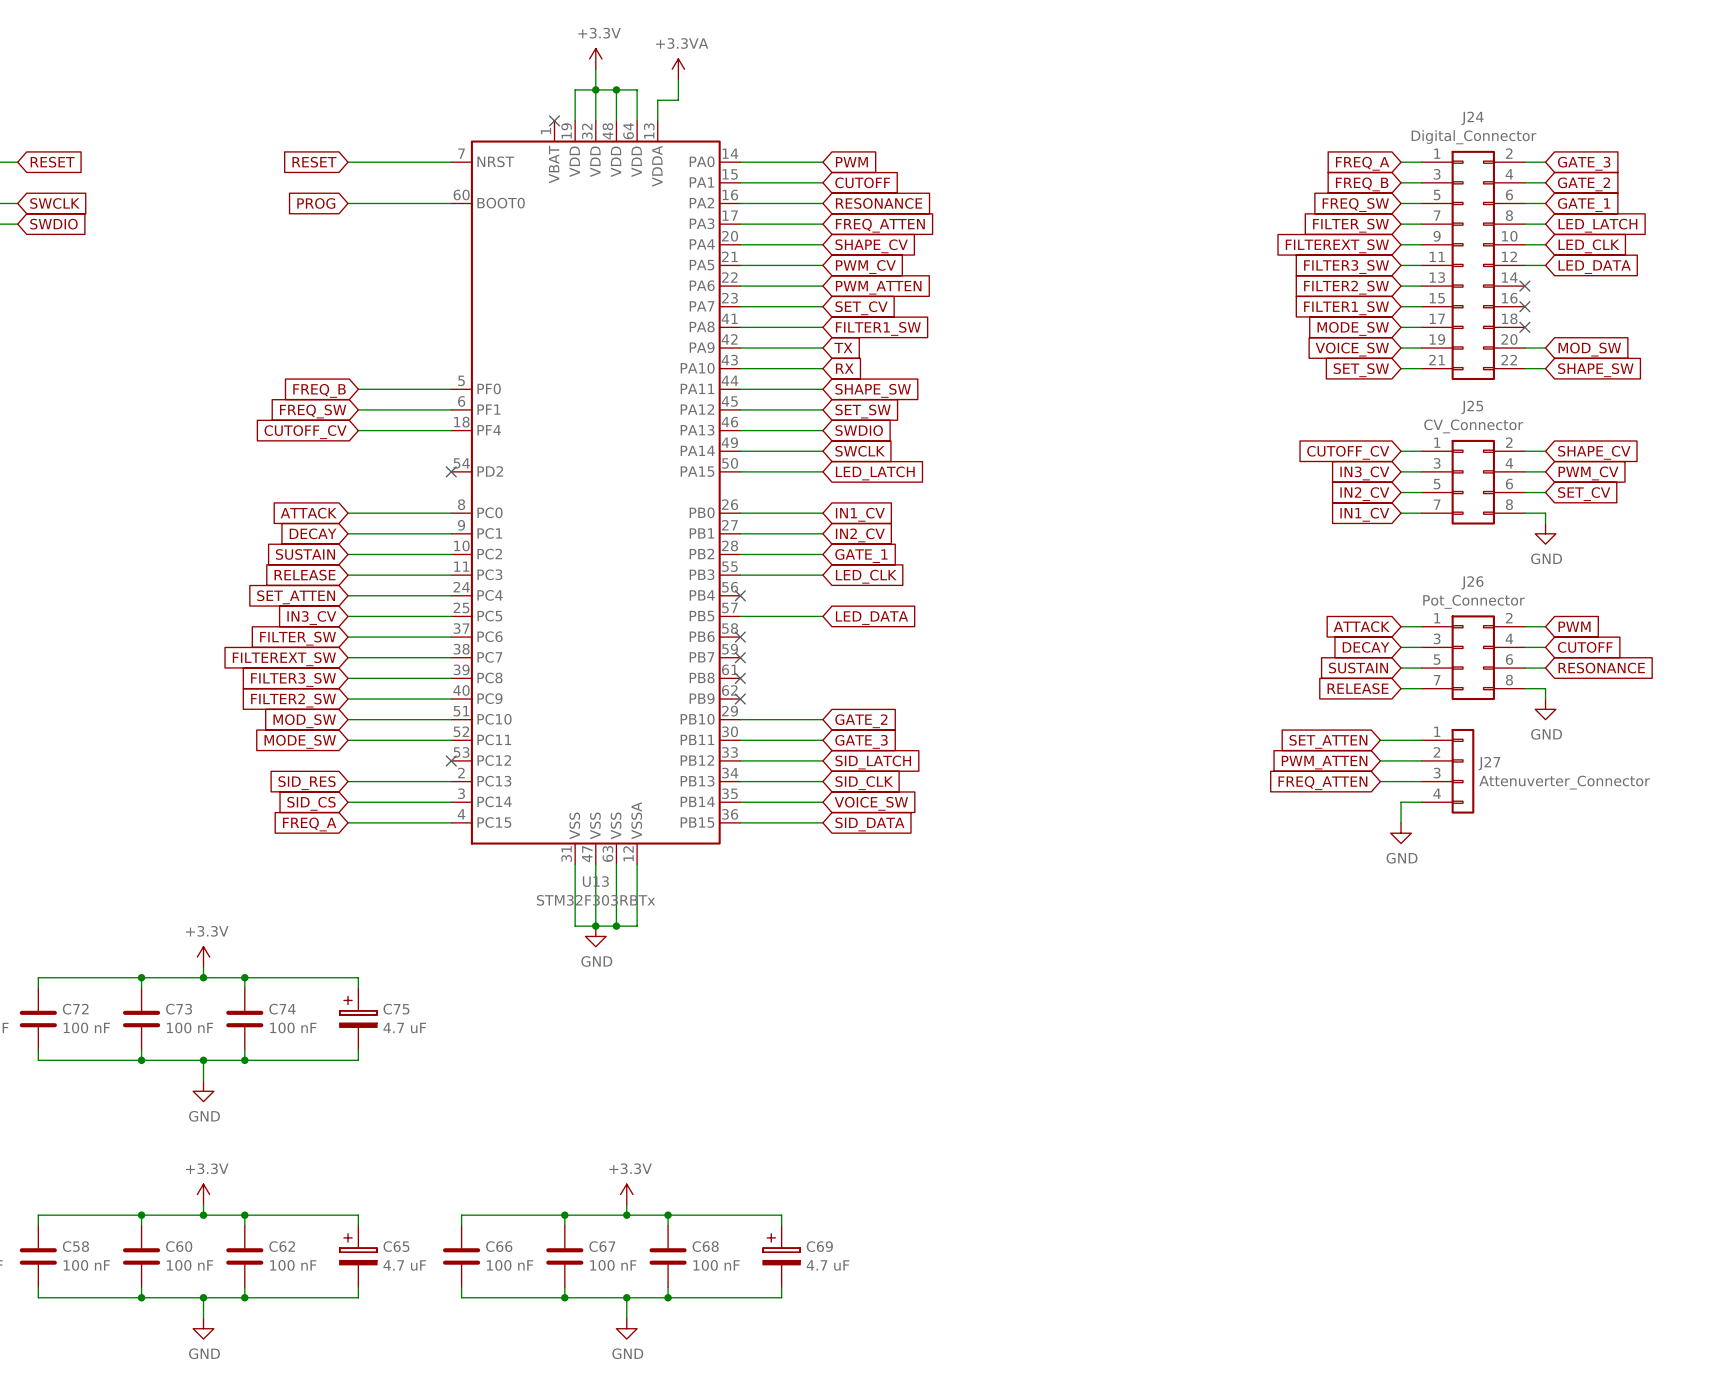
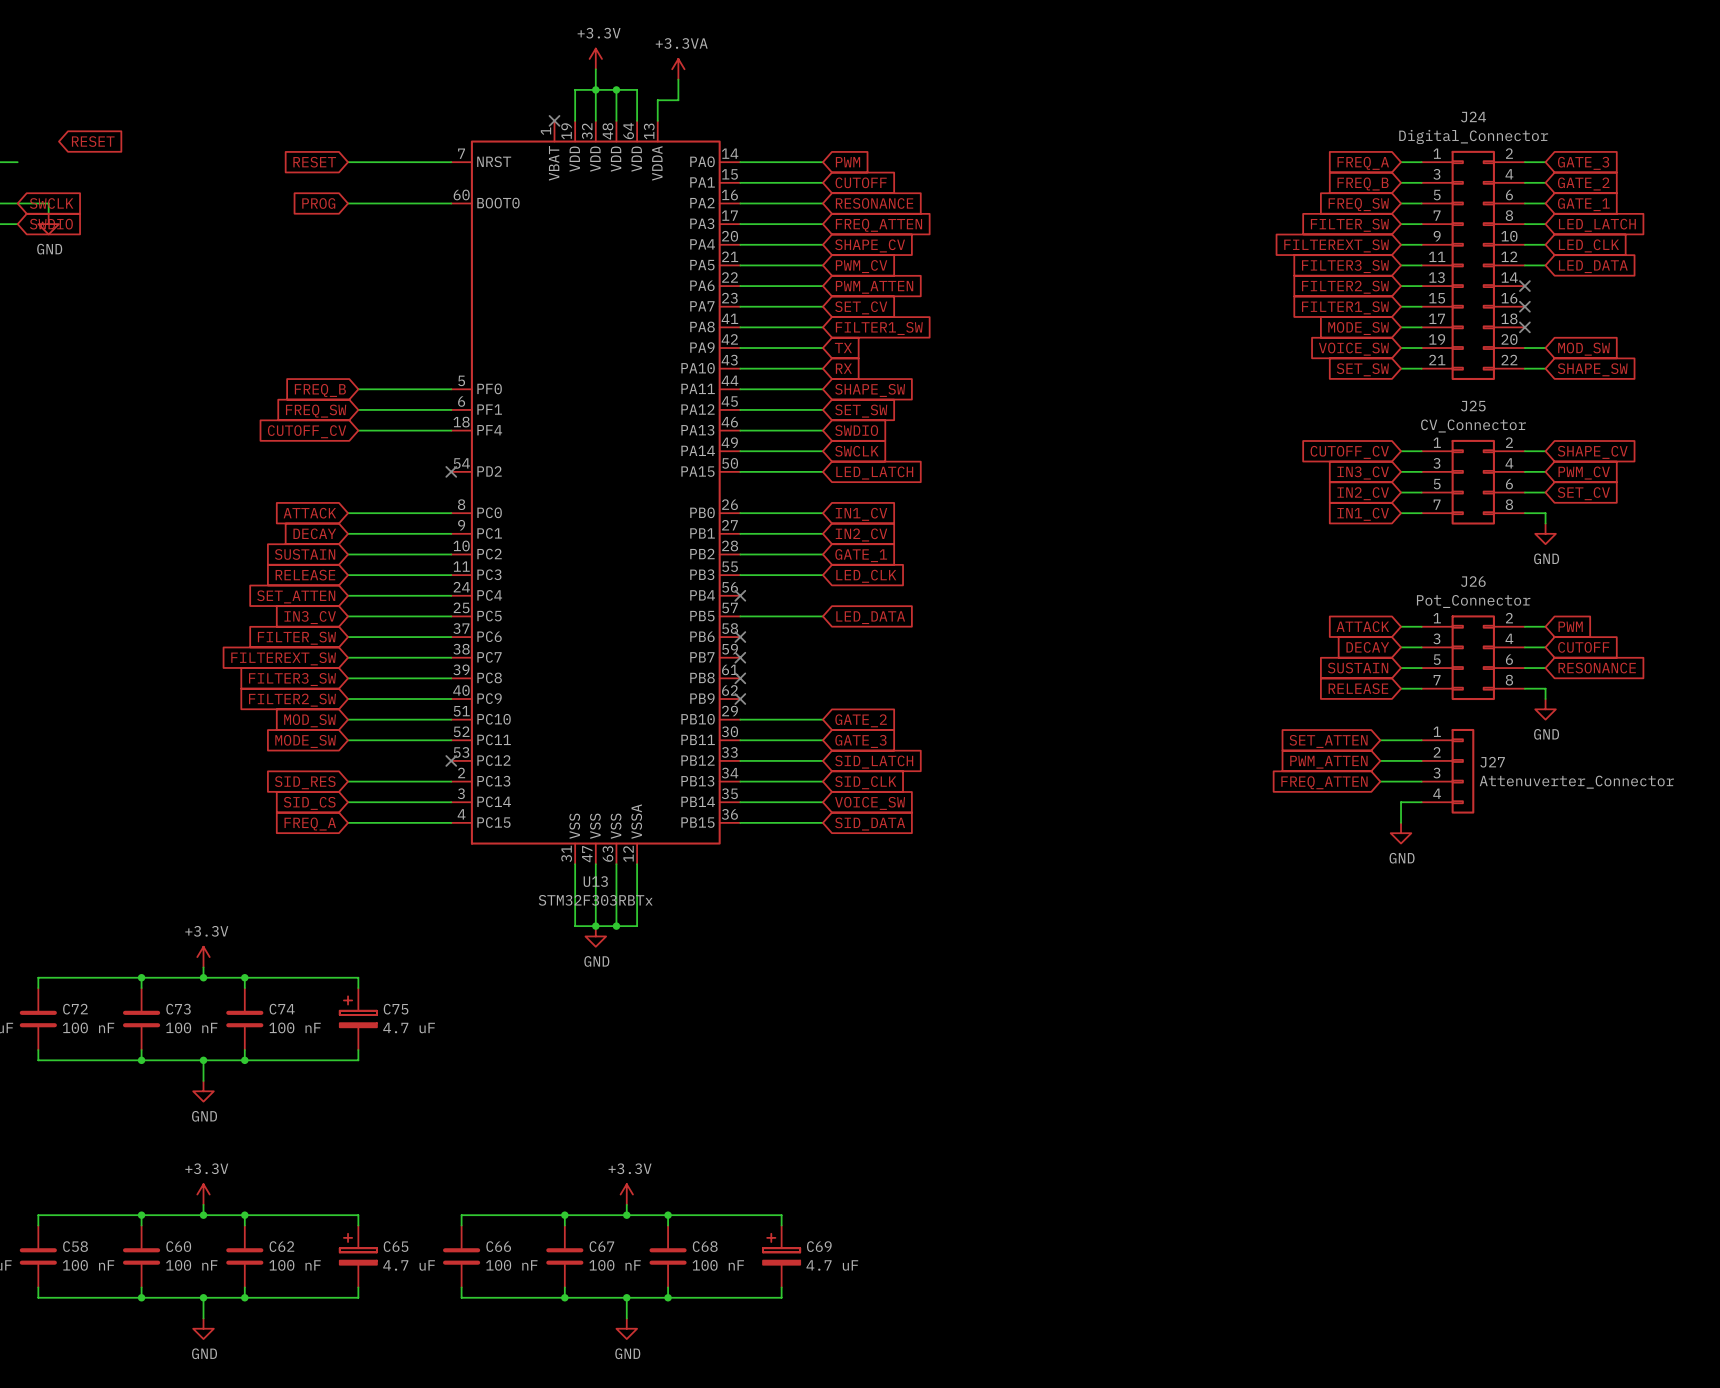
global label position: RESET (52, 162) -> RESET (93, 141)
wire: none -> (17, 203) (48, 203) (48, 213)
power symbol: none -> GND (48, 224)

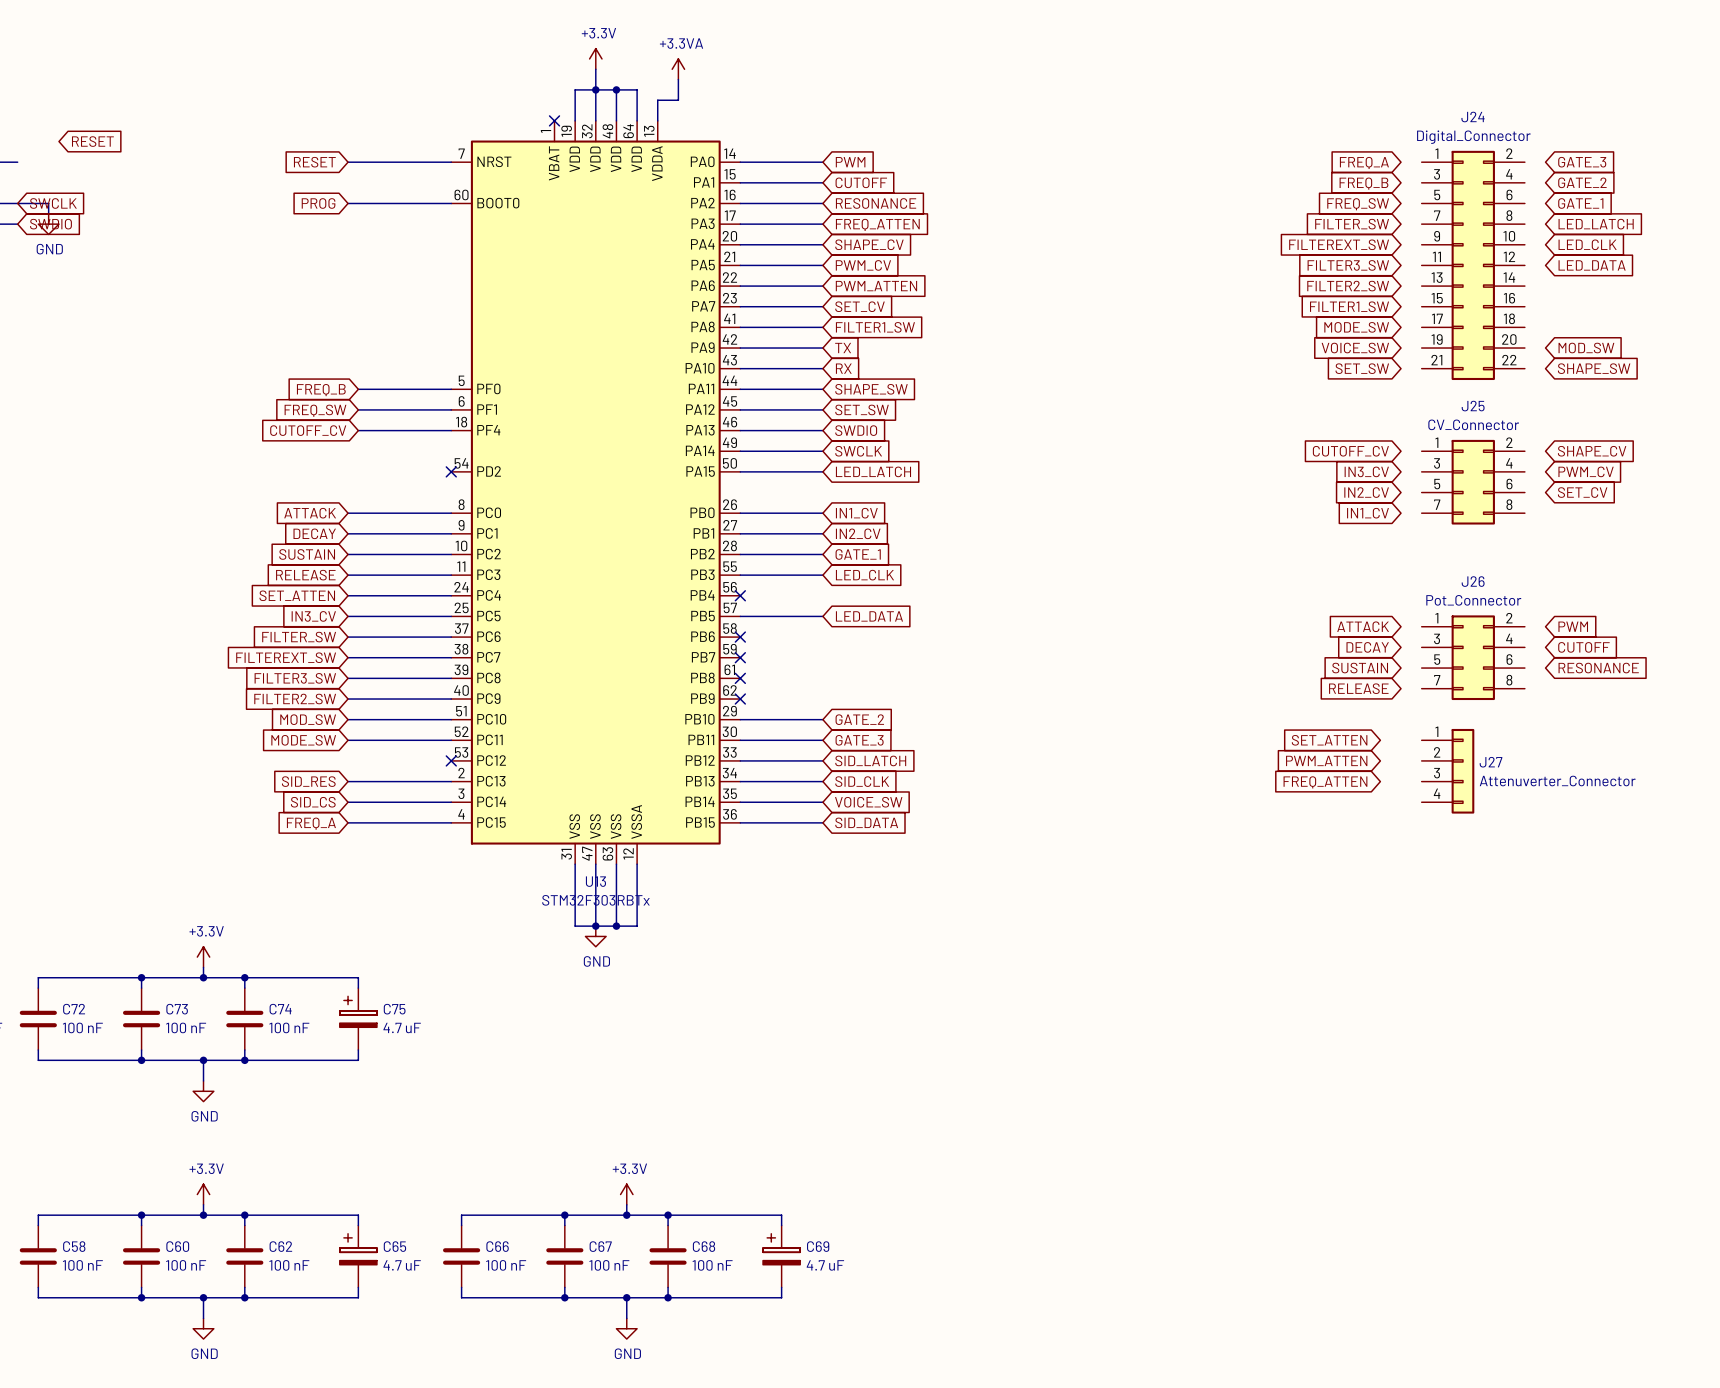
wire: (1401, 162) (1421, 162) -> none
wire: (1524, 162) (1545, 162) -> none
wire: (1401, 182) (1421, 182) -> none
wire: (1524, 182) (1545, 182) -> none
wire: (1401, 203) (1421, 203) -> none
wire: (1524, 203) (1545, 203) -> none
wire: (1401, 224) (1421, 224) -> none
wire: (1524, 224) (1545, 224) -> none
wire: (1401, 244) (1421, 244) -> none
wire: (1524, 244) (1545, 244) -> none
wire: (1401, 265) (1421, 265) -> none
wire: (1524, 265) (1545, 265) -> none
wire: (1401, 286) (1421, 286) -> none
no-connect mark: (1524, 286) -> none
wire: (1401, 306) (1421, 306) -> none
no-connect mark: (1524, 306) -> none
wire: (1401, 327) (1421, 327) -> none
no-connect mark: (1524, 327) -> none
wire: (1401, 348) (1421, 348) -> none
wire: (1524, 348) (1545, 348) -> none
wire: (1401, 368) (1421, 368) -> none
wire: (1524, 368) (1545, 368) -> none
wire: (1401, 451) (1421, 451) -> none
wire: (1524, 451) (1545, 451) -> none
wire: (1401, 471) (1421, 471) -> none
wire: (1524, 471) (1545, 471) -> none
wire: (1401, 492) (1421, 492) -> none
wire: (1524, 492) (1545, 492) -> none
wire: (1401, 513) (1421, 513) -> none
wire: (1524, 513) (1545, 513) (1545, 523) -> none
power symbol: GND (1545, 533) -> none
wire: (1401, 626) (1421, 626) -> none
wire: (1524, 626) (1545, 626) -> none
wire: (1401, 647) (1421, 647) -> none
wire: (1524, 647) (1545, 647) -> none
wire: (1401, 668) (1421, 668) -> none
wire: (1524, 668) (1545, 668) -> none
wire: (1401, 688) (1421, 688) -> none
wire: (1524, 688) (1545, 688) (1545, 699) -> none
power symbol: GND (1545, 709) -> none
wire: (1380, 740) (1421, 740) -> none
wire: (1380, 760) (1421, 760) -> none
wire: (1380, 781) (1421, 781) -> none
wire: (1421, 802) (1401, 802) (1401, 822) -> none
power symbol: GND (1401, 833) -> none

